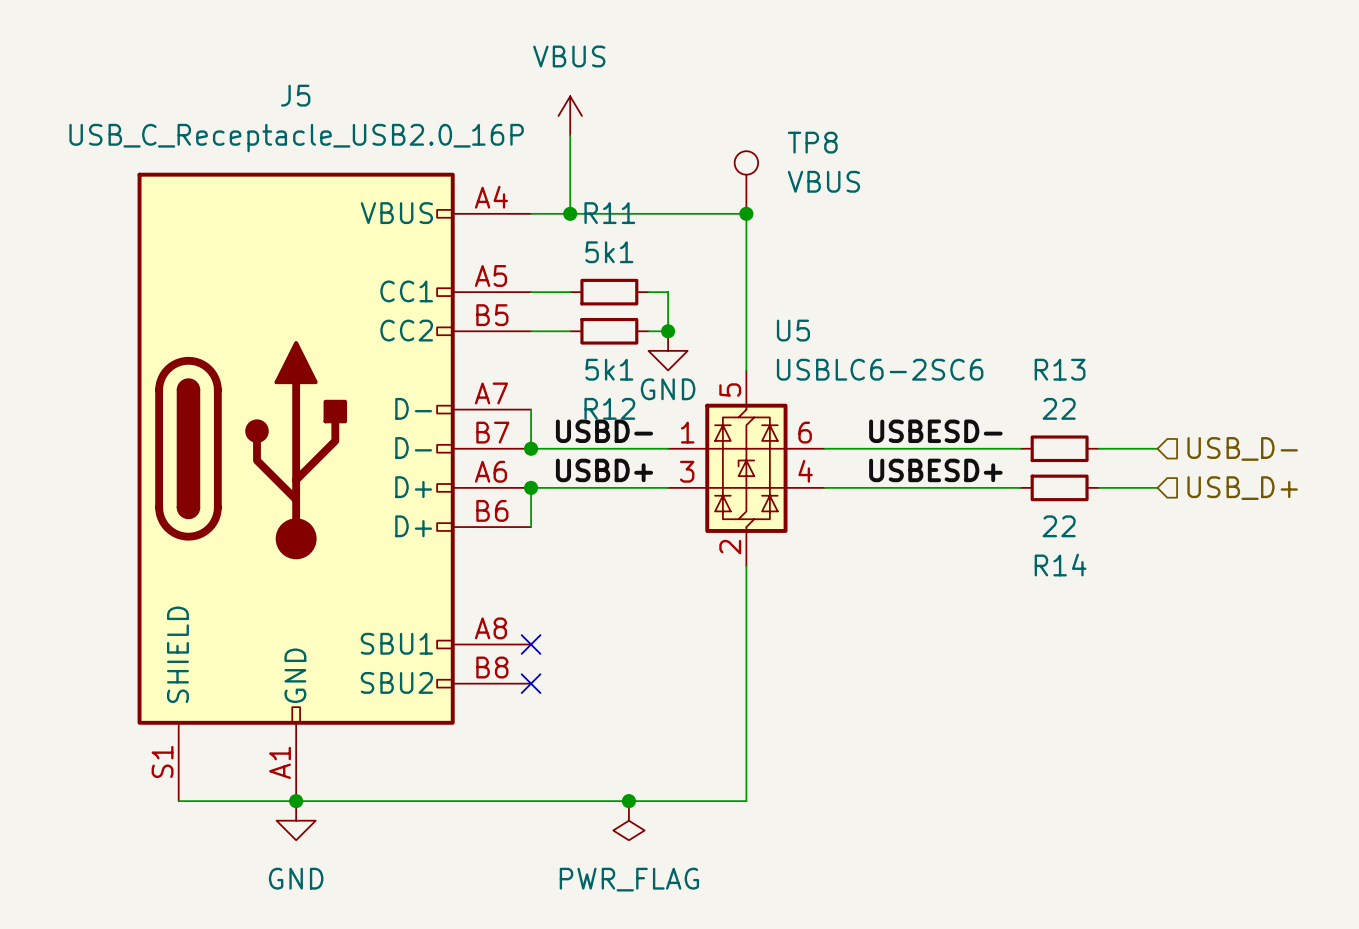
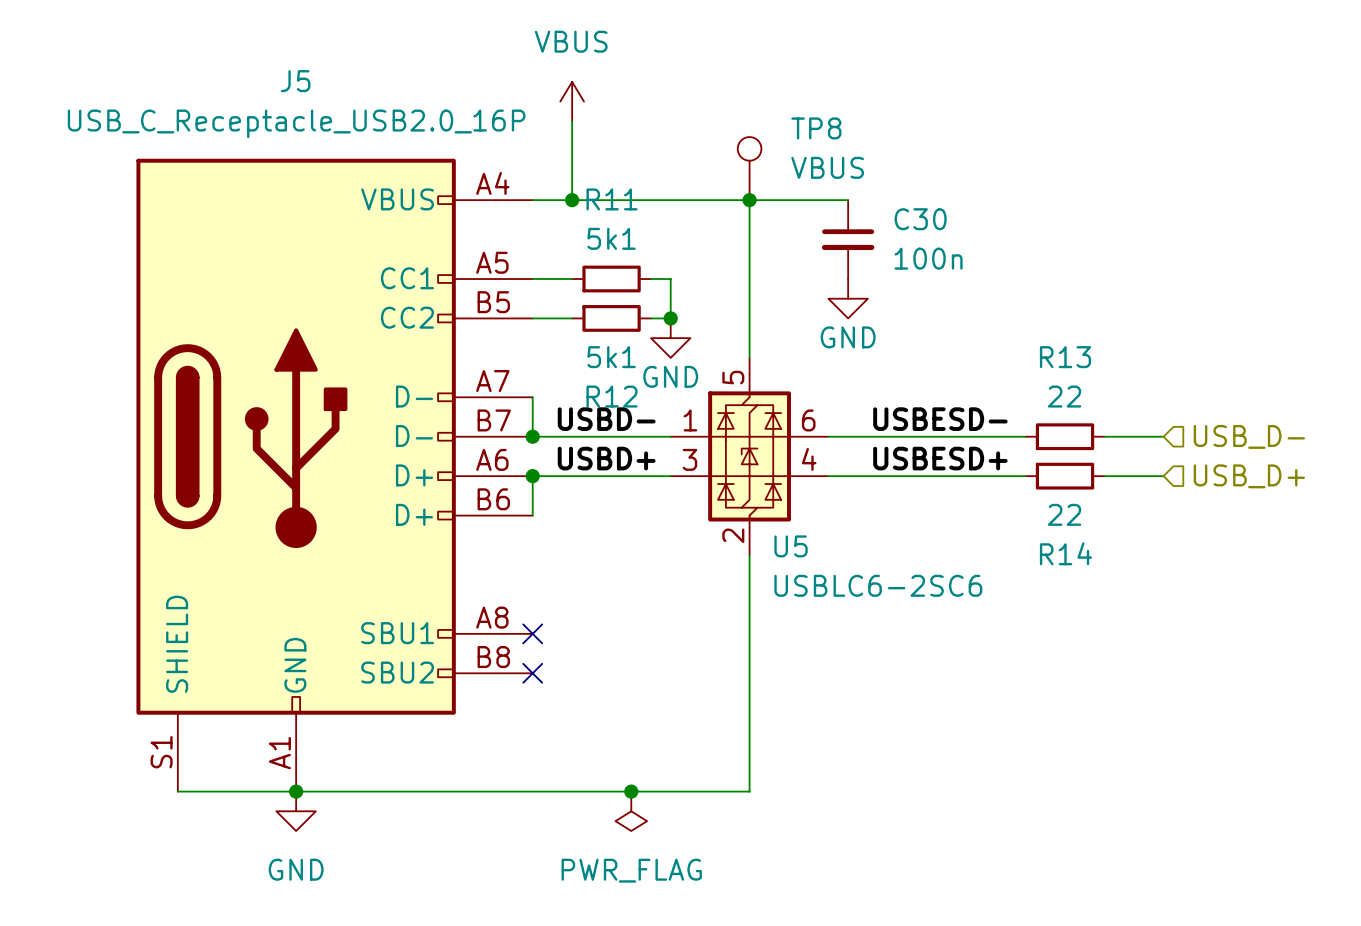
wire: none -> (749, 200) (848, 200)
C30: none -> 100n (848, 239)
power symbol: none -> GND (848, 298)
U5 name position: U5 (793, 330) -> U5 (791, 546)
U5 value position: USBLC6-2SC6 (880, 369) -> USBLC6-2SC6 (878, 585)

